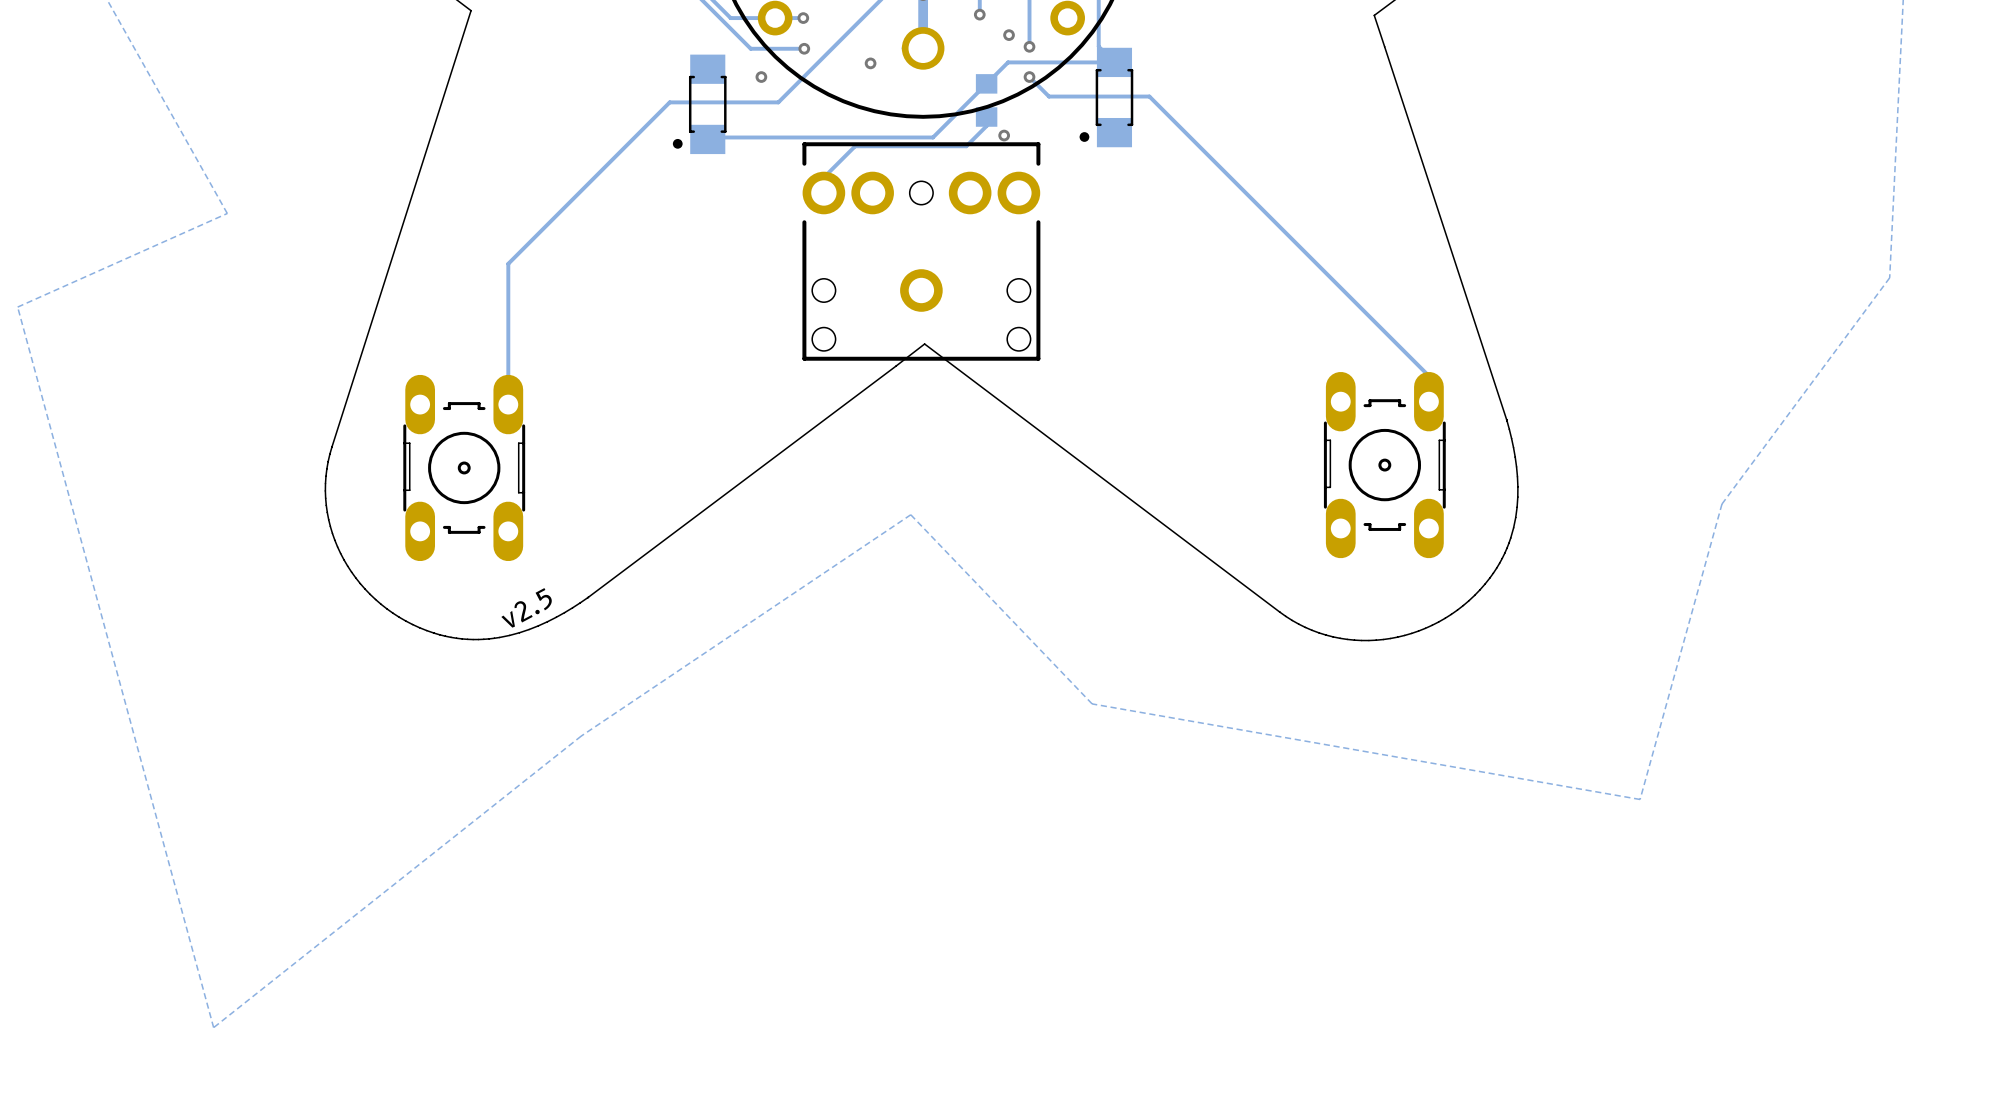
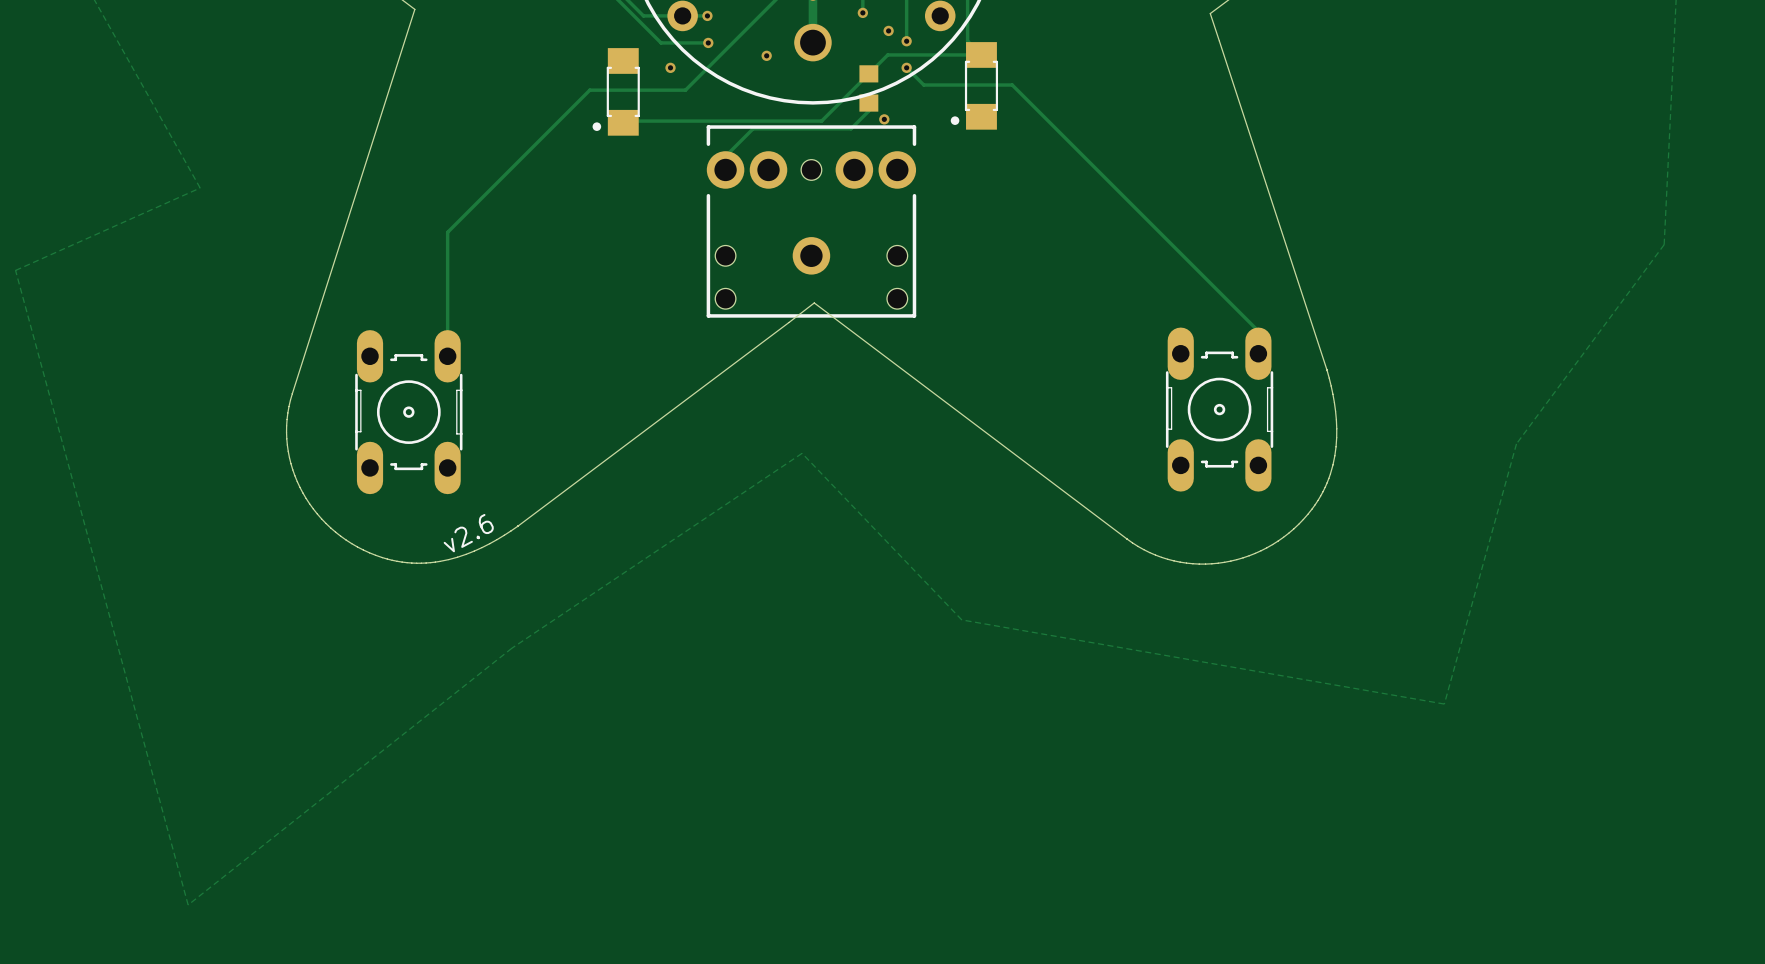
text: v2.5 (526, 607) -> v2.6 (468, 533)

